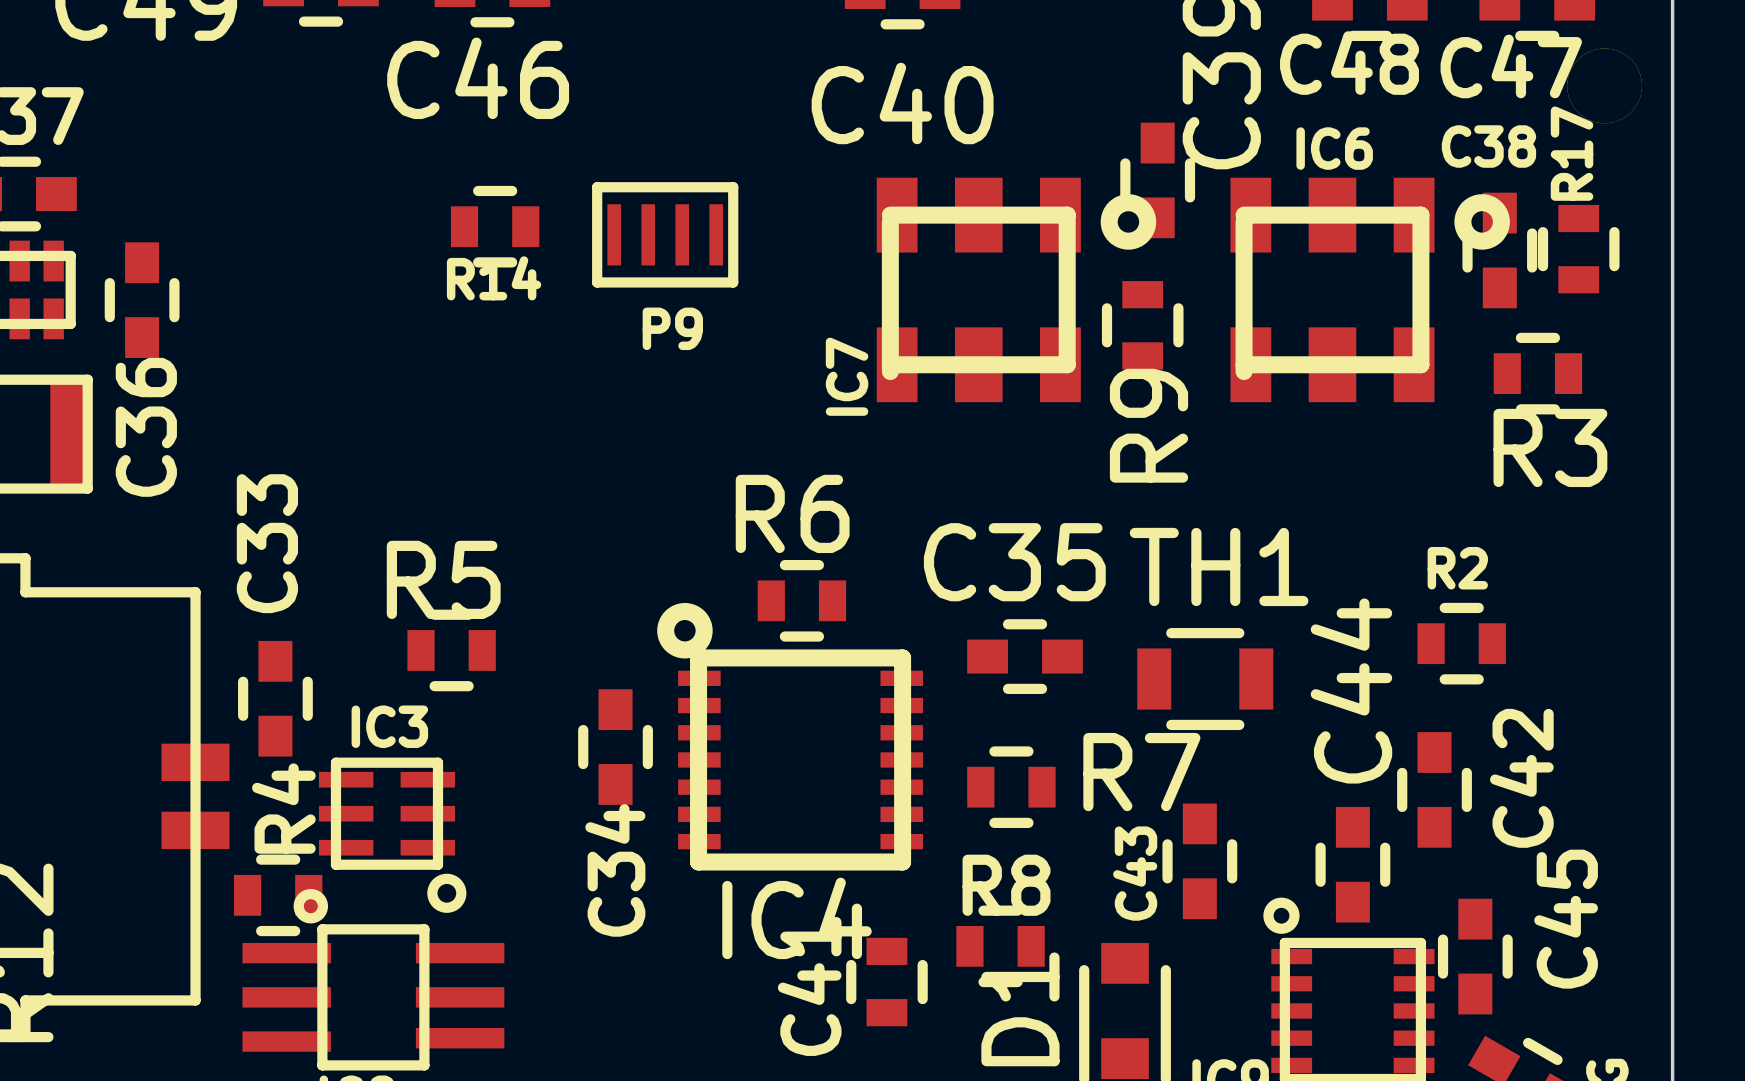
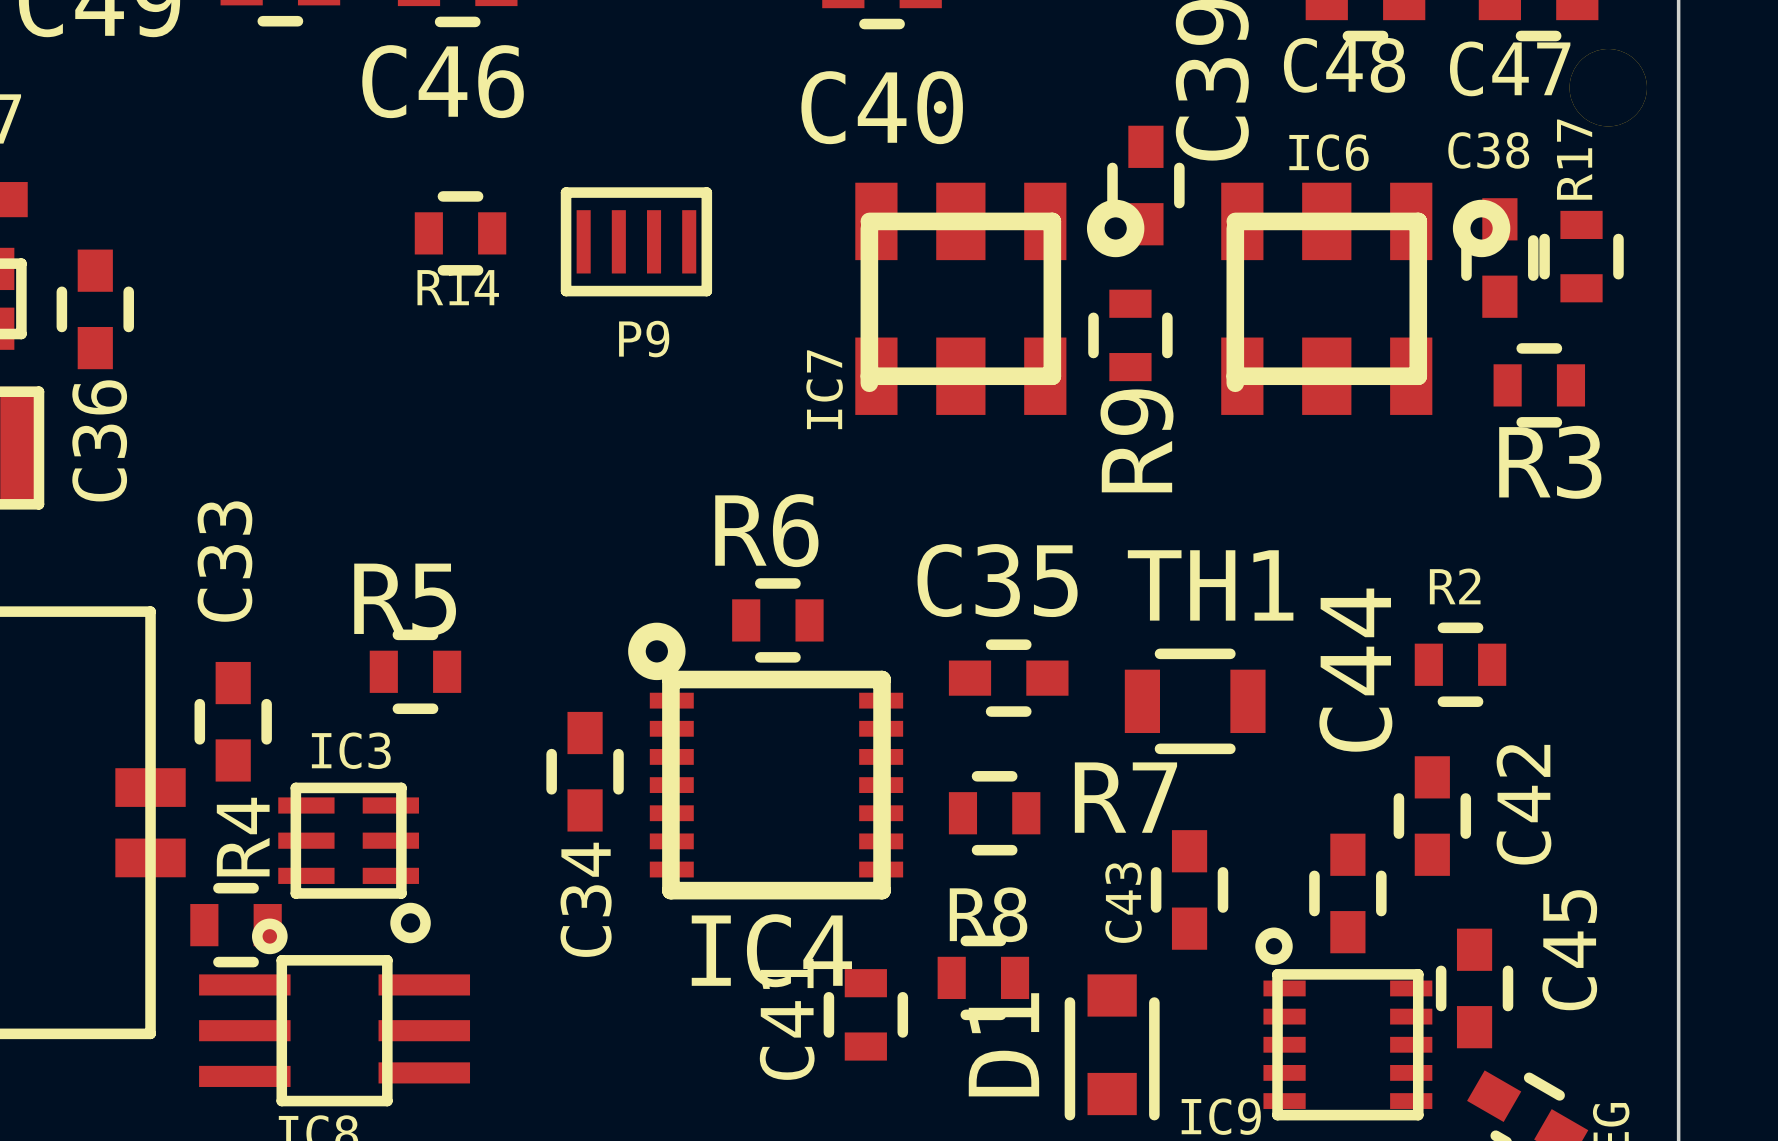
C44 name position: C44 (1351, 691) -> C44 (1355, 670)

